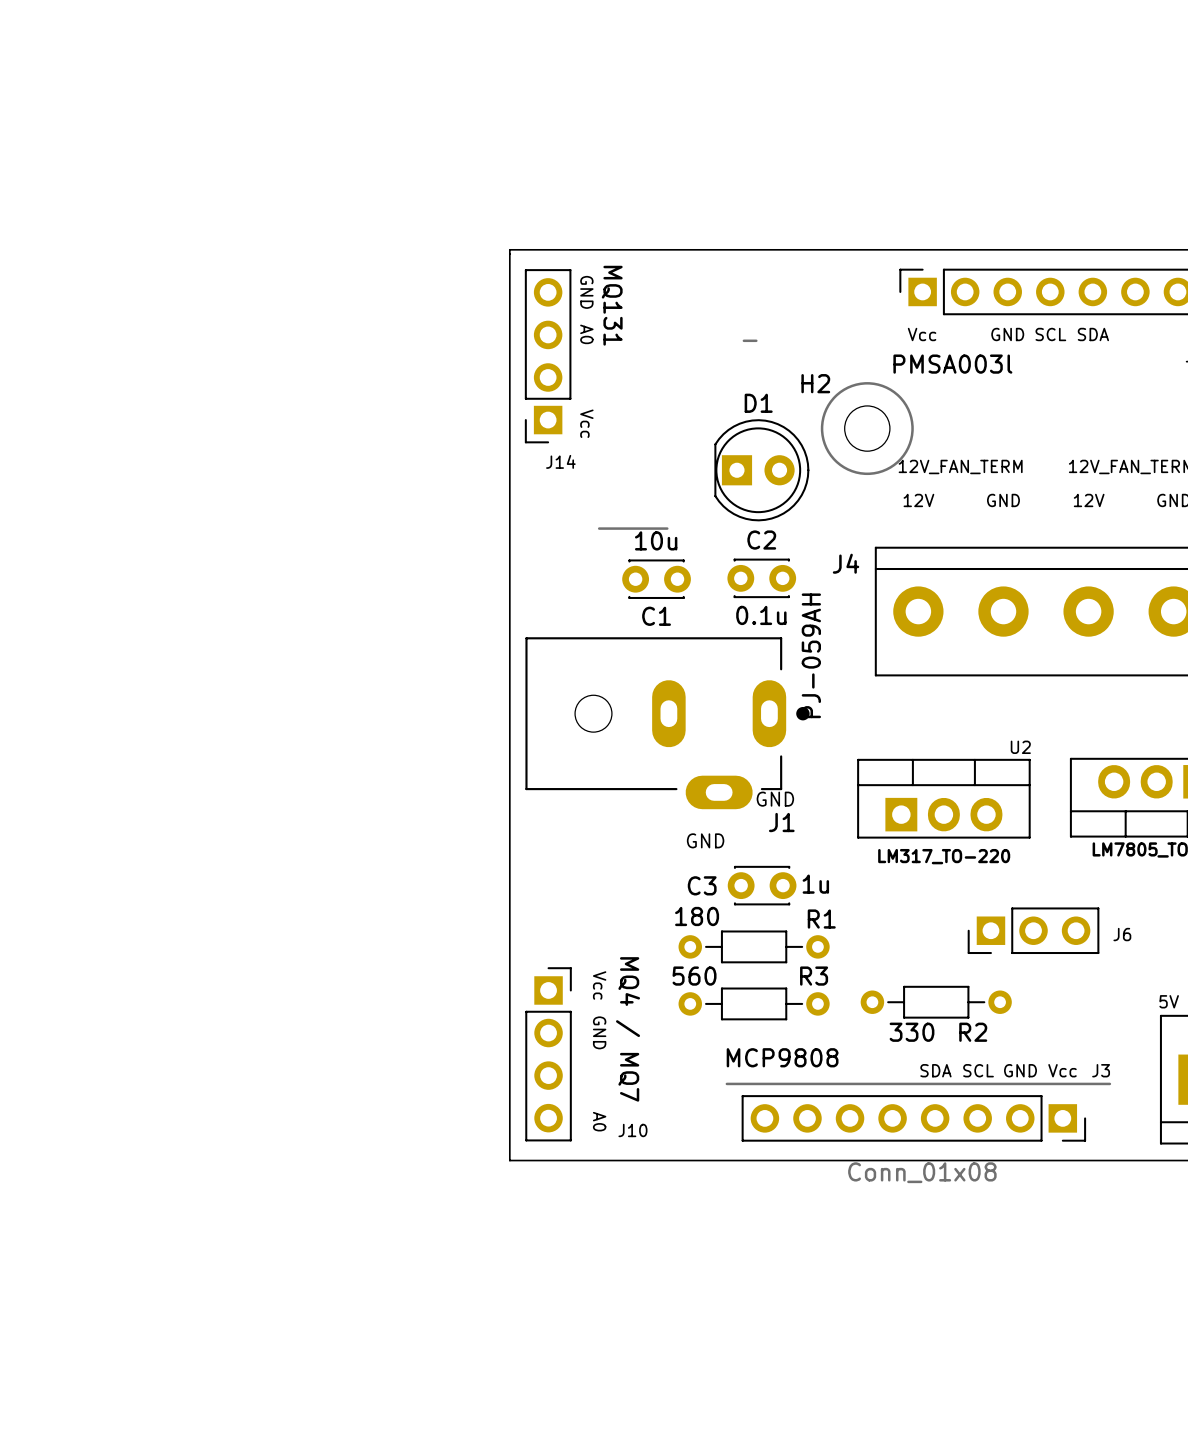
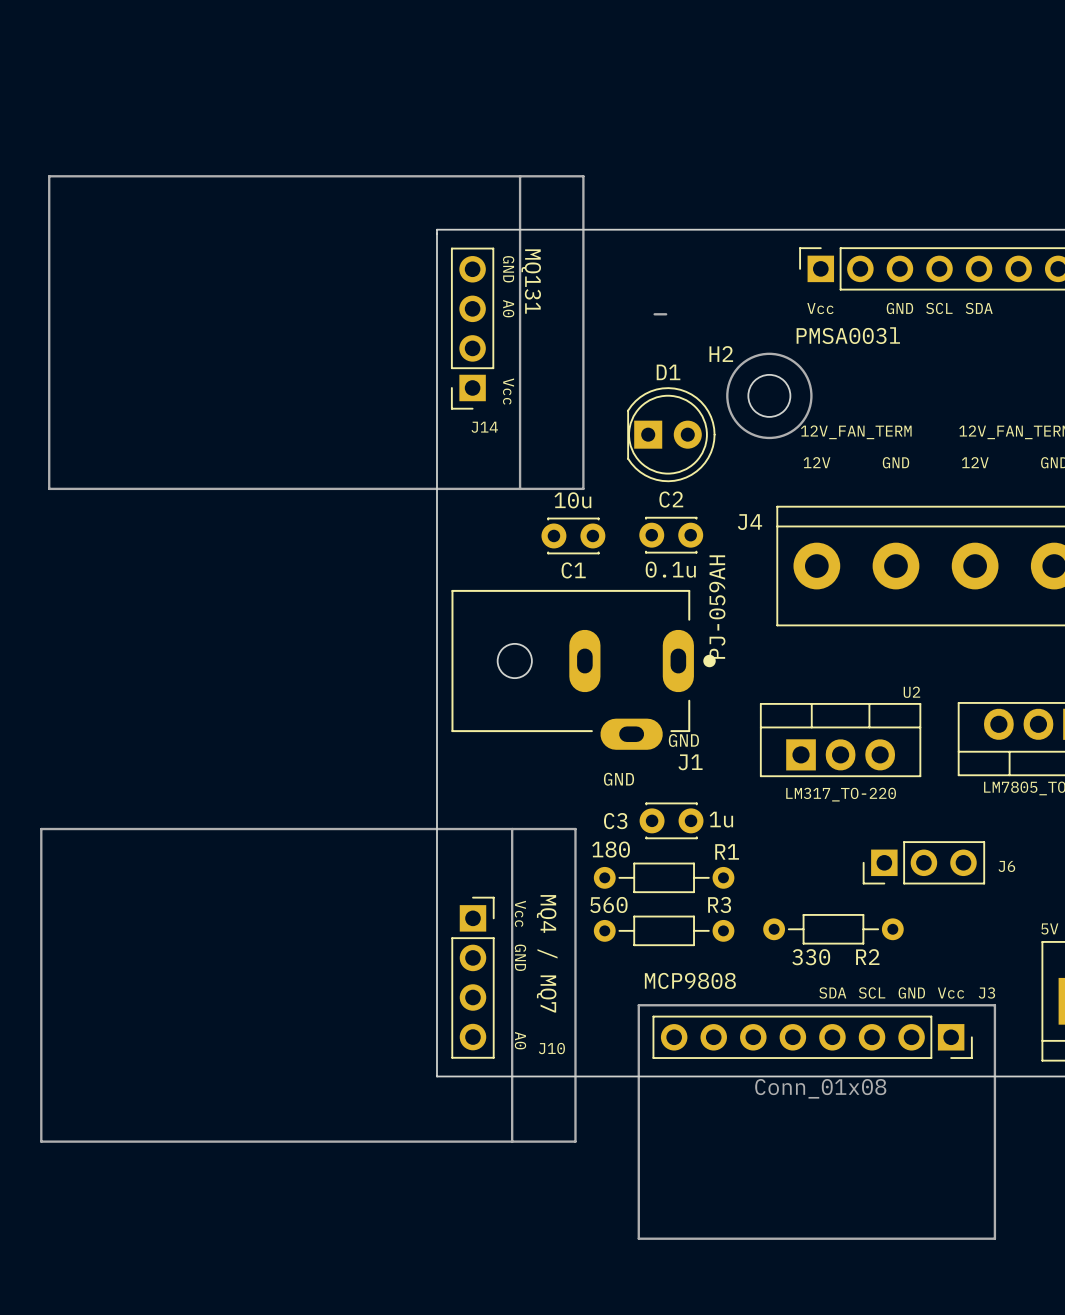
line: none -> (520, 176) (520, 488) (49, 488) (49, 176) (583, 176) (583, 488)
line: none -> (41, 829) (575, 829) (575, 1141) (41, 1141) (41, 829)
line: none -> (512, 829) (512, 1141)
line: none -> (638, 1005) (638, 1238) (994, 1238) (994, 1005)

